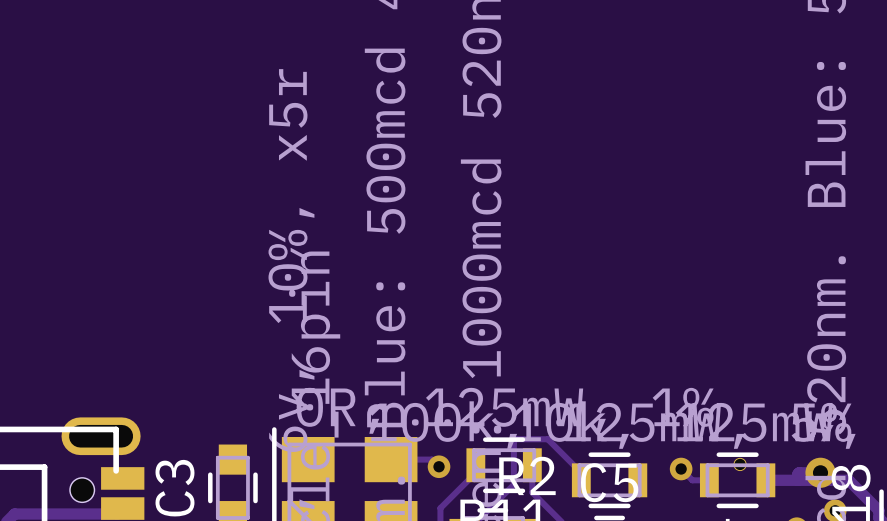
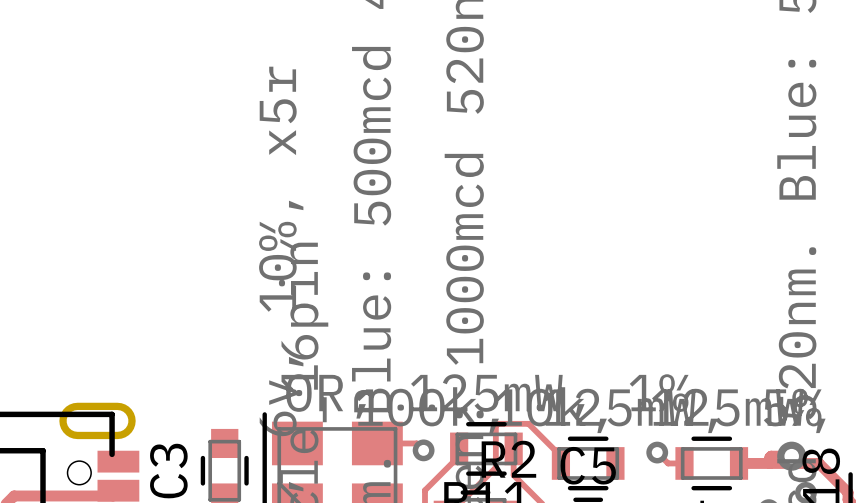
part: (740, 464) -> none

